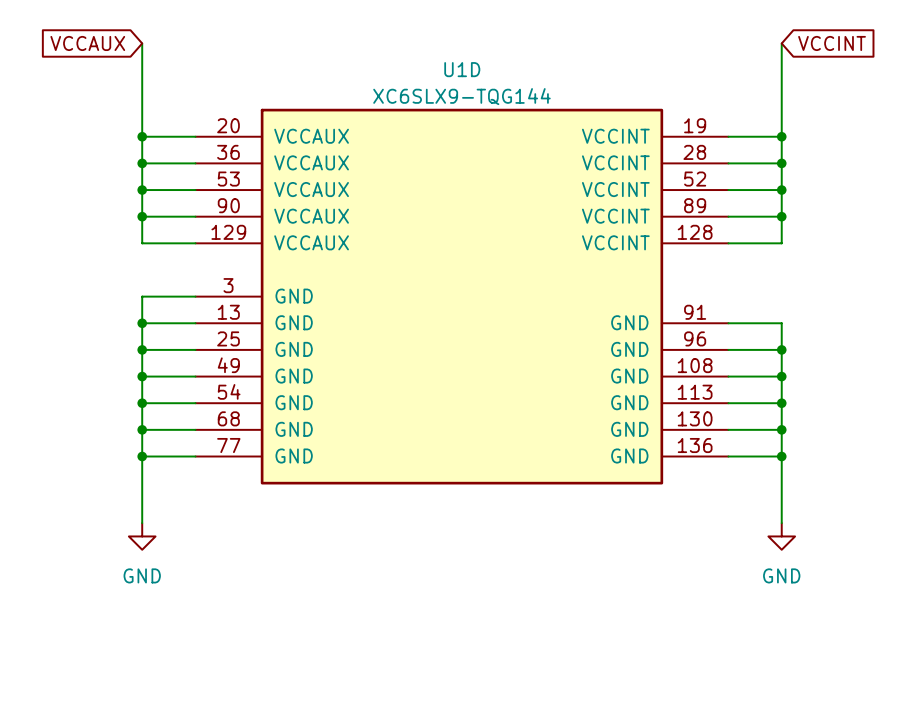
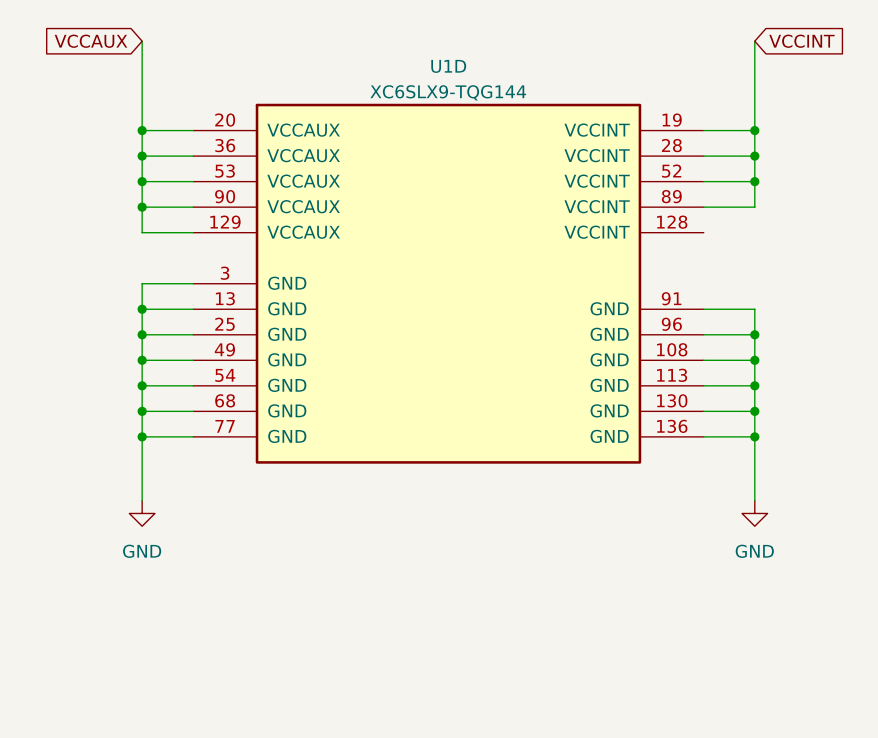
wire: (781, 216) (781, 243) (728, 243) -> none
junction: (781, 216) -> none

